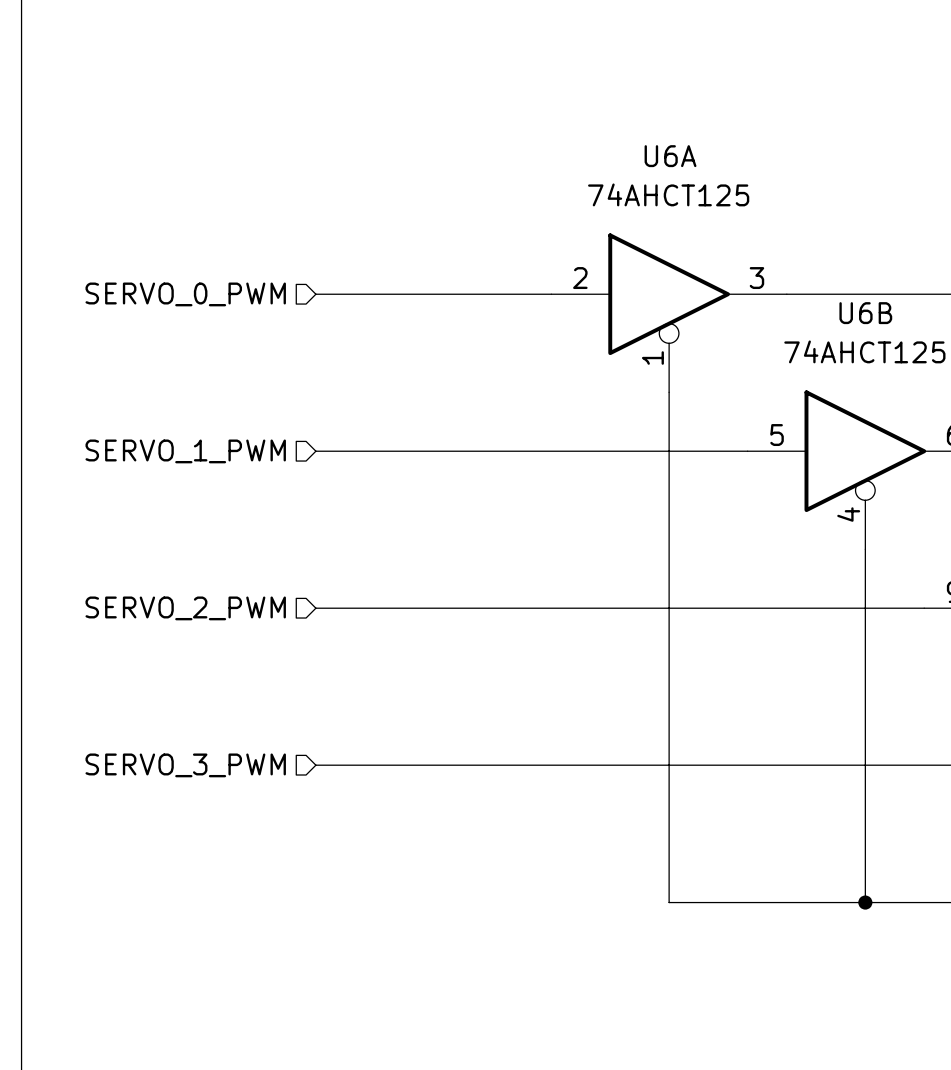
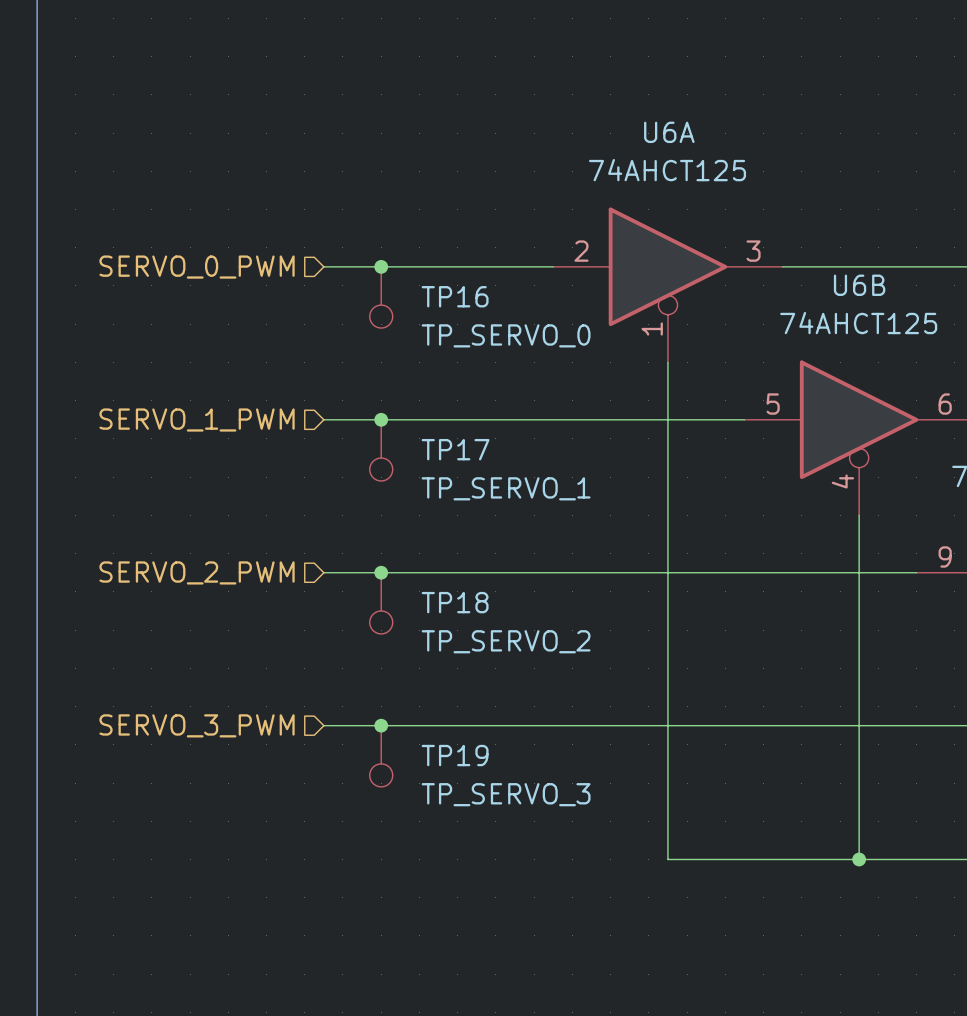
junction: none -> (381, 266)
TP16: none -> TP_SERVO_0 (381, 297)
junction: none -> (381, 419)
TP17: none -> TP_SERVO_1 (381, 450)
junction: none -> (381, 572)
TP18: none -> TP_SERVO_2 (381, 603)
junction: none -> (381, 725)
TP19: none -> TP_SERVO_3 (381, 756)

